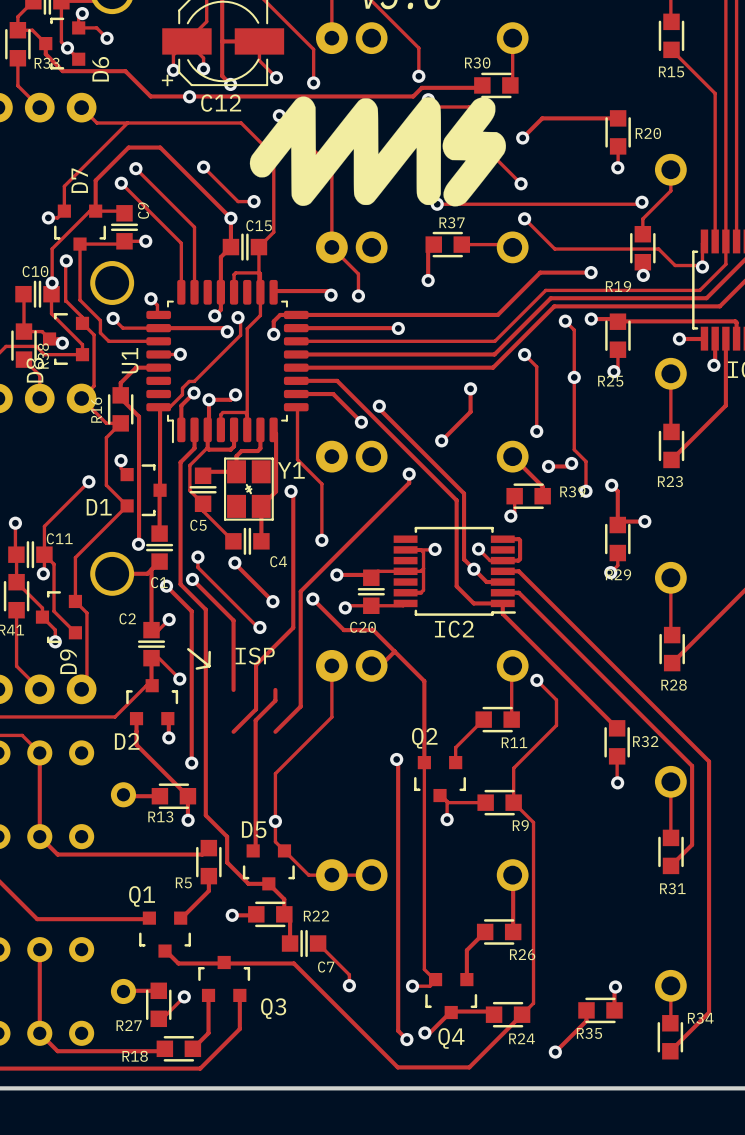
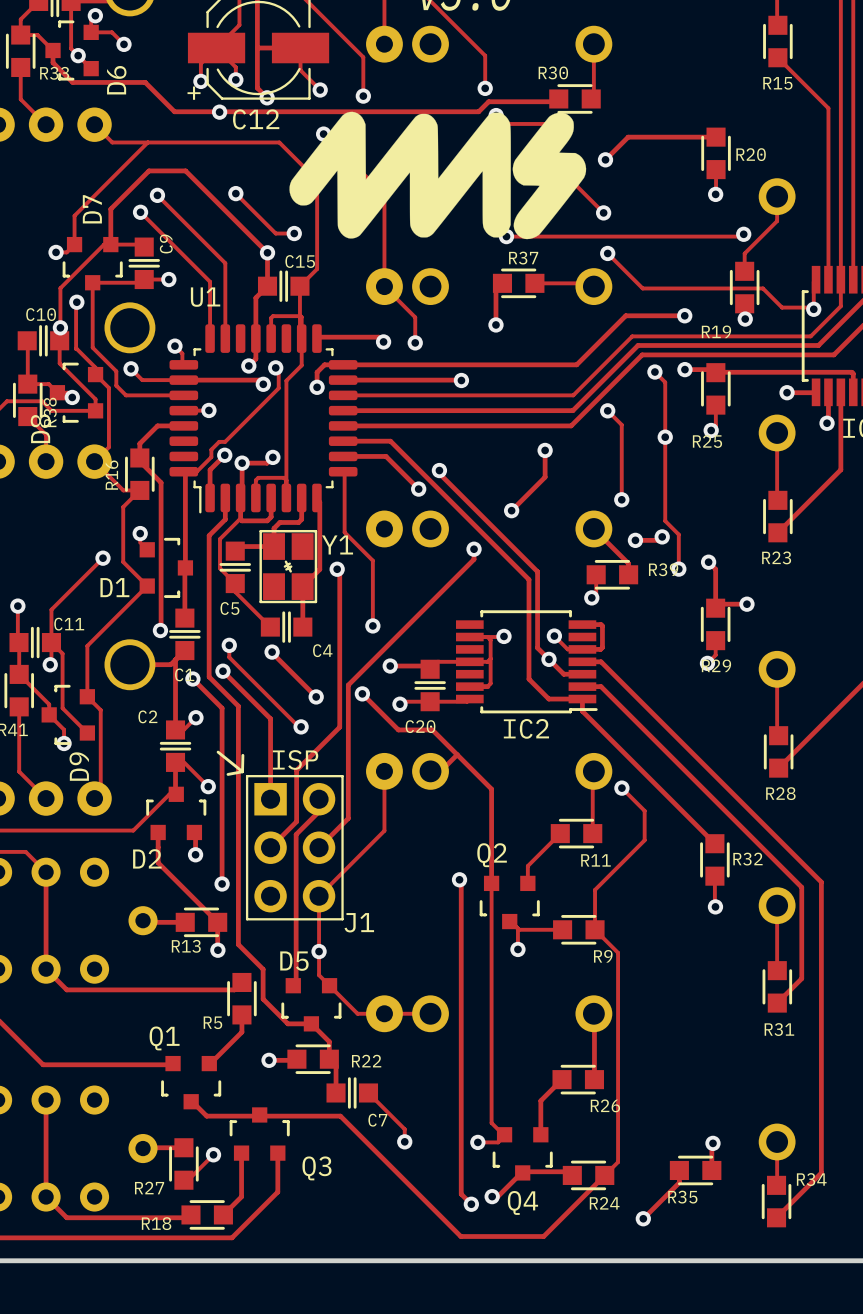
U1 name rotation: 0° (130, 360) -> 90° clockwise (205, 297)
U1 name position: U1 (130, 360) -> U1 (205, 297)
J1: none -> (294, 847)

